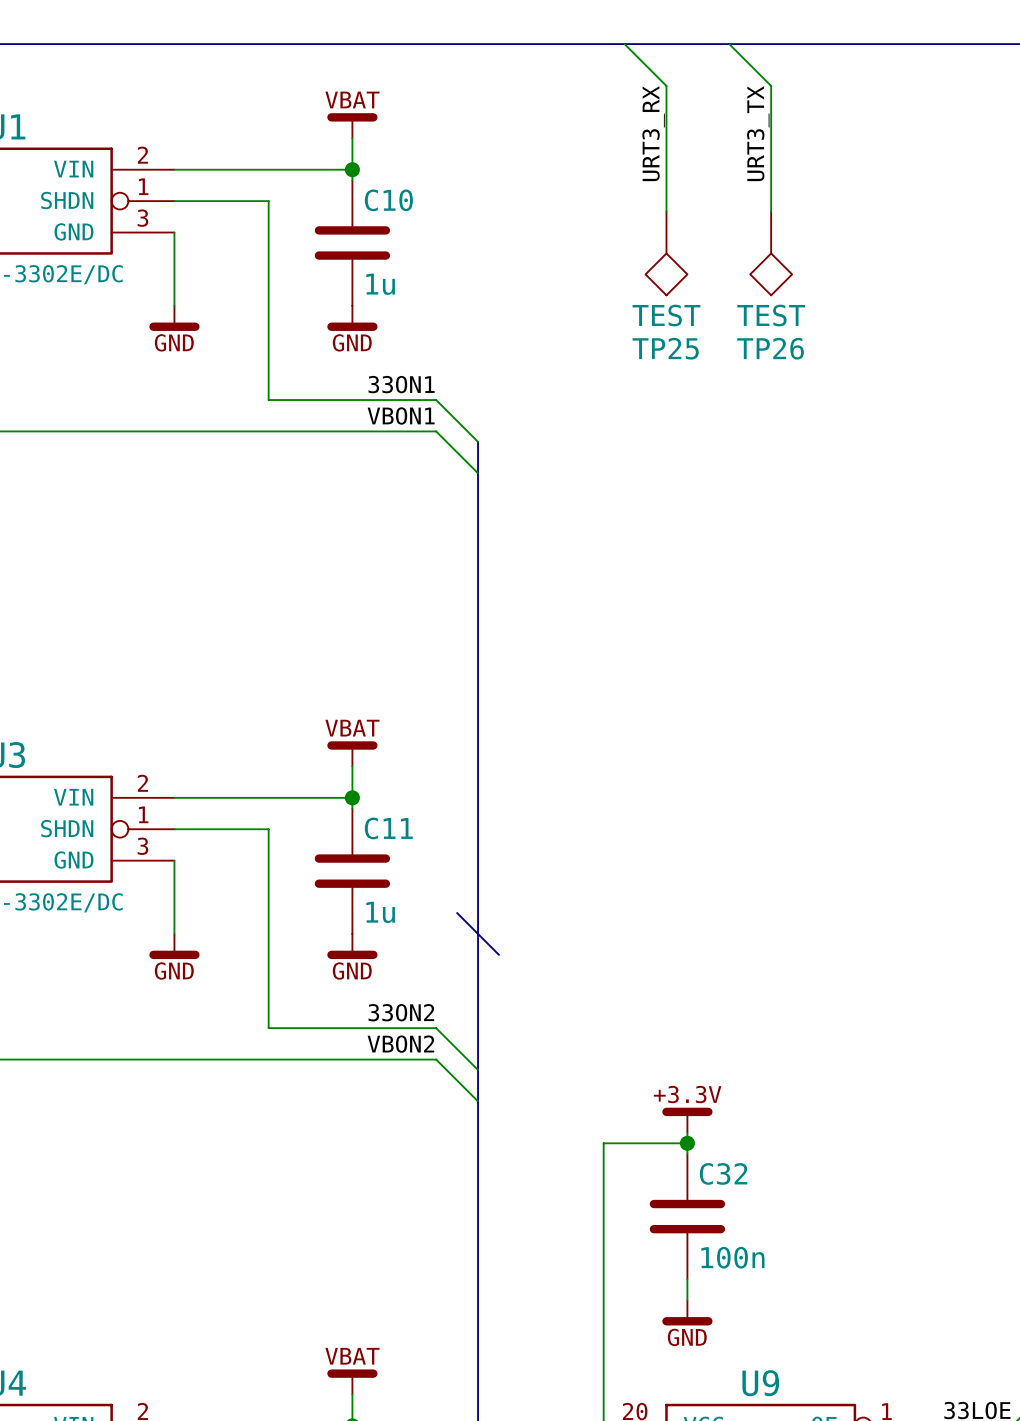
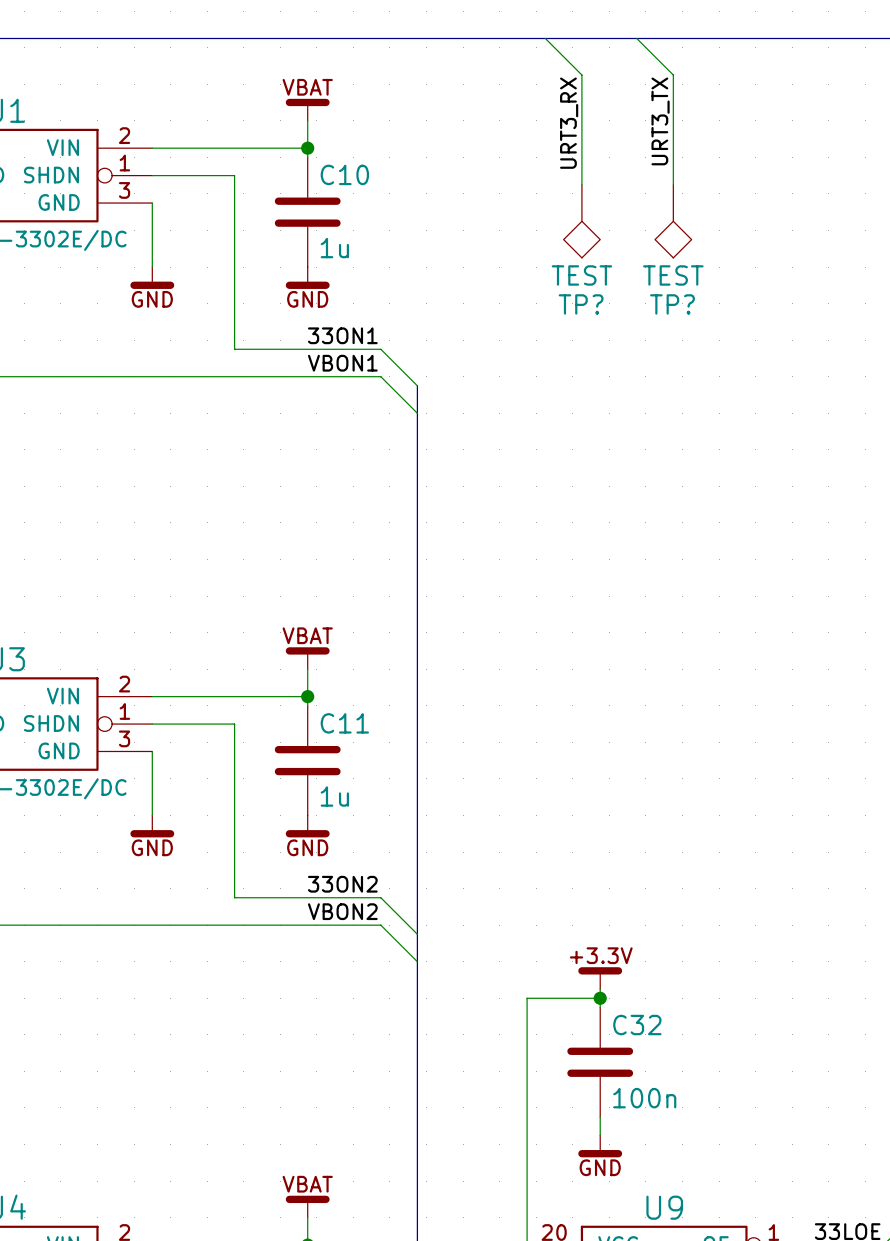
TP25 name: TP25 (665, 348) -> TP? (581, 304)
TP26 name: TP26 (770, 348) -> TP? (672, 304)
bus: (457, 913) (498, 954) -> none

